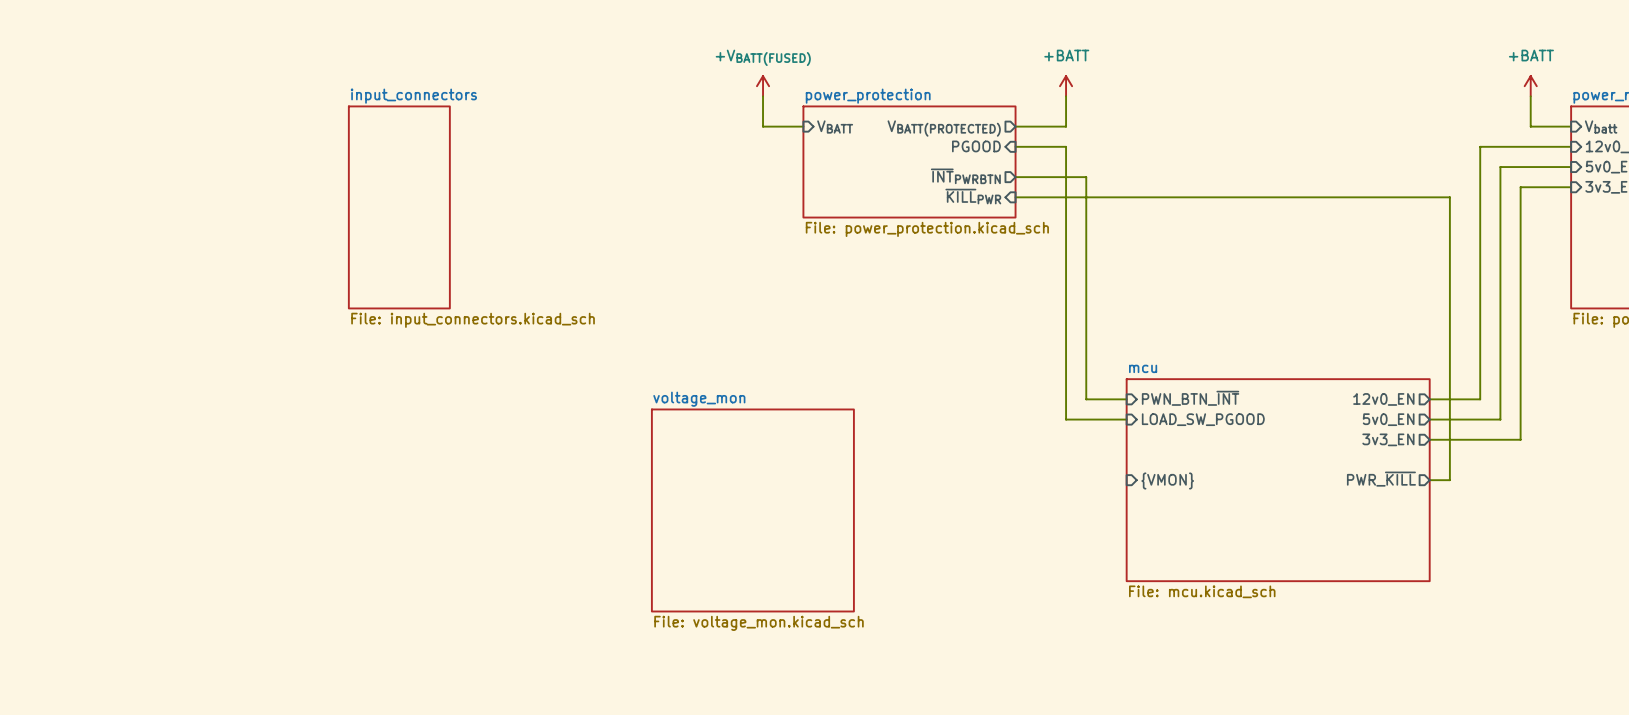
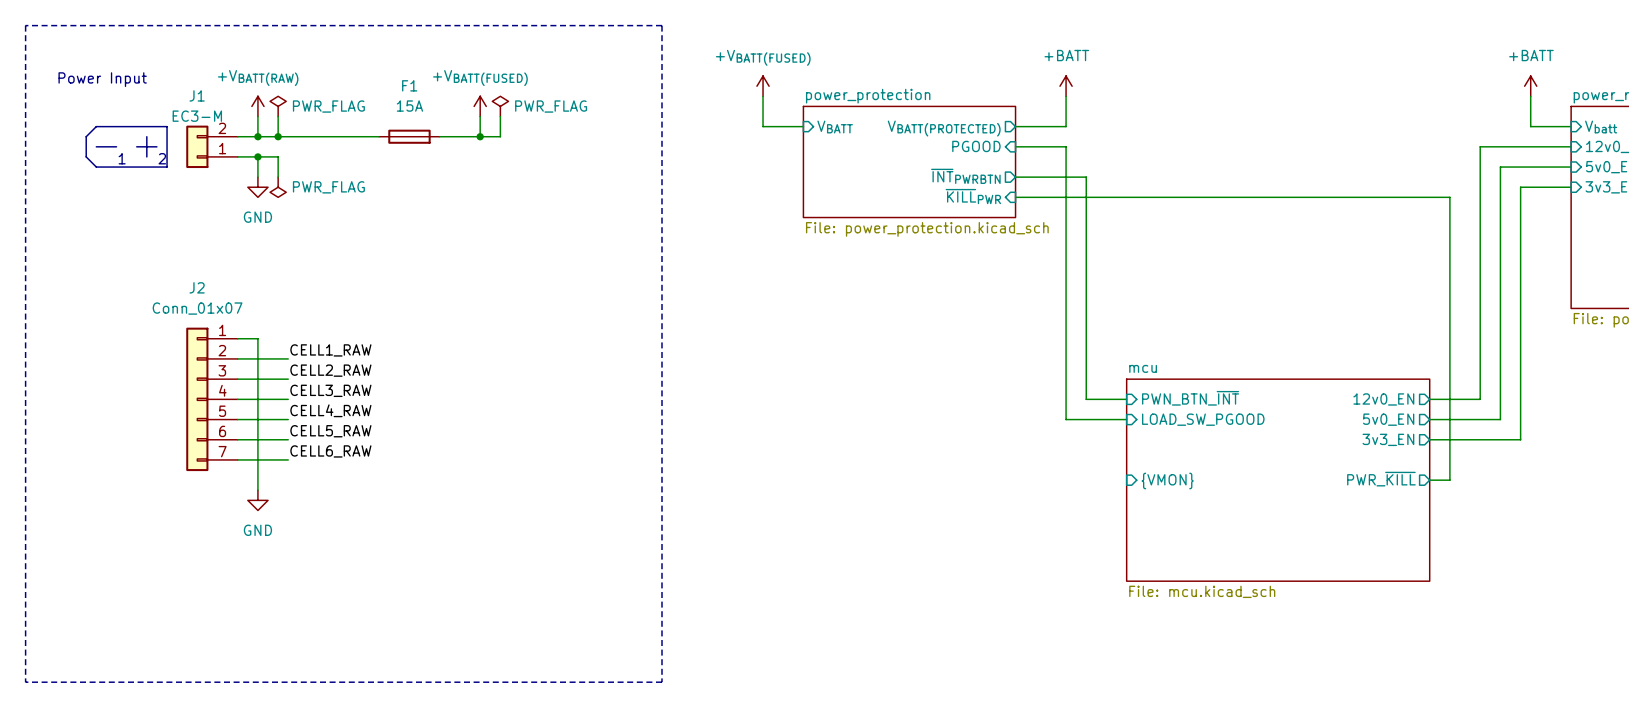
line: none -> (25, 25) (662, 25) (662, 682) (25, 682) (25, 25)
text: none -> Power Input (102, 79)
power symbol: none -> +VBATT(RAW) (257, 106)
power symbol: none -> PWR_FLAG (278, 106)
power symbol: none -> +VBATT(FUSED) (480, 106)
power symbol: none -> PWR_FLAG (500, 106)
wire: none -> (257, 116) (257, 136)
wire: none -> (278, 116) (278, 136)
wire: none -> (480, 116) (480, 136)
wire: none -> (500, 116) (500, 136) (439, 136)
line: none -> (96, 126) (86, 136) (86, 156) (96, 167) (167, 167) (167, 126) (96, 126)
line: none -> (146, 136) (146, 156)
wire: none -> (237, 136) (379, 136)
junction: none -> (257, 136)
junction: none -> (278, 136)
F1: none -> 15A (409, 136)
junction: none -> (480, 136)
line: none -> (96, 146) (116, 146)
line: none -> (136, 146) (156, 146)
J1: none -> EC3-M (211, 146)
wire: none -> (237, 156) (278, 156) (278, 177)
wire: none -> (257, 156) (257, 177)
junction: none -> (257, 156)
text: none -> 1 (122, 158)
text: none -> 2 (162, 158)
power symbol: none -> GND (257, 187)
power symbol: none -> PWR_FLAG (278, 187)
sheet input_connectors: File: input_connectors.kicad_sch (399, 207) -> none
wire: none -> (237, 338) (257, 338) (257, 490)
label: none -> CELL1_RAW (330, 350)
wire: none -> (237, 358) (288, 358)
label: none -> CELL2_RAW (330, 370)
wire: none -> (237, 379) (288, 379)
label: none -> CELL3_RAW (330, 390)
J2: none -> Conn_01x07 (211, 399)
wire: none -> (237, 399) (288, 399)
label: none -> CELL4_RAW (330, 410)
wire: none -> (237, 419) (288, 419)
label: none -> CELL5_RAW (330, 431)
wire: none -> (237, 439) (288, 439)
label: none -> CELL6_RAW (330, 451)
wire: none -> (237, 459) (288, 459)
power symbol: none -> GND (257, 500)
sheet voltage_mon: File: voltage_mon.kicad_sch (752, 510) -> none

